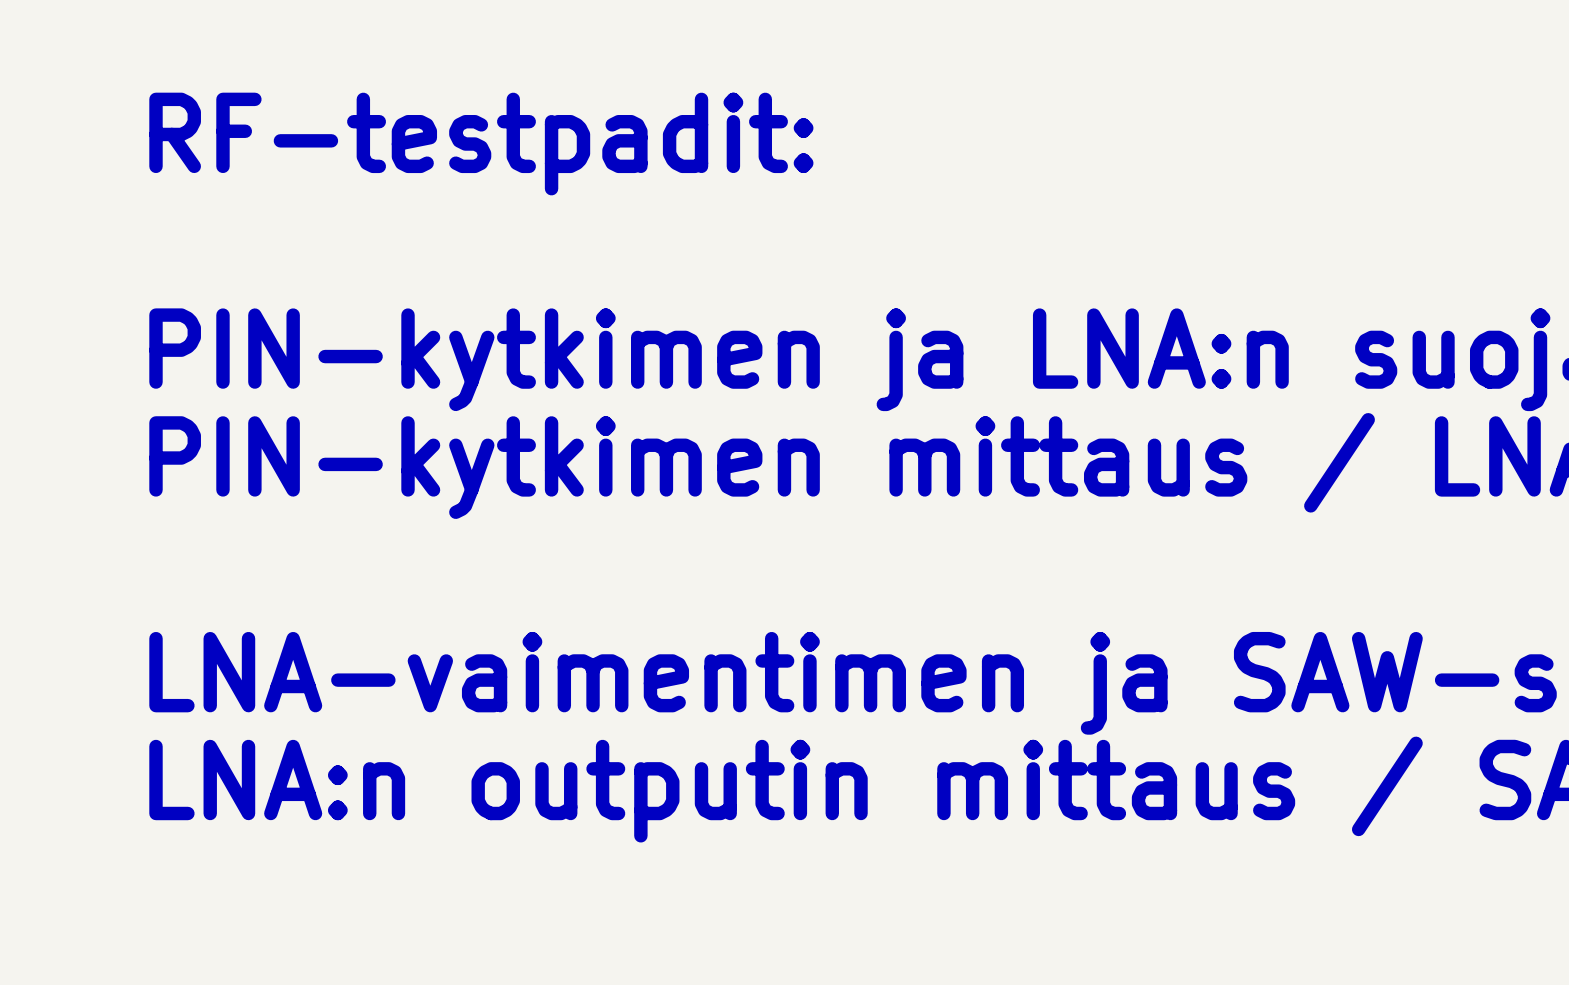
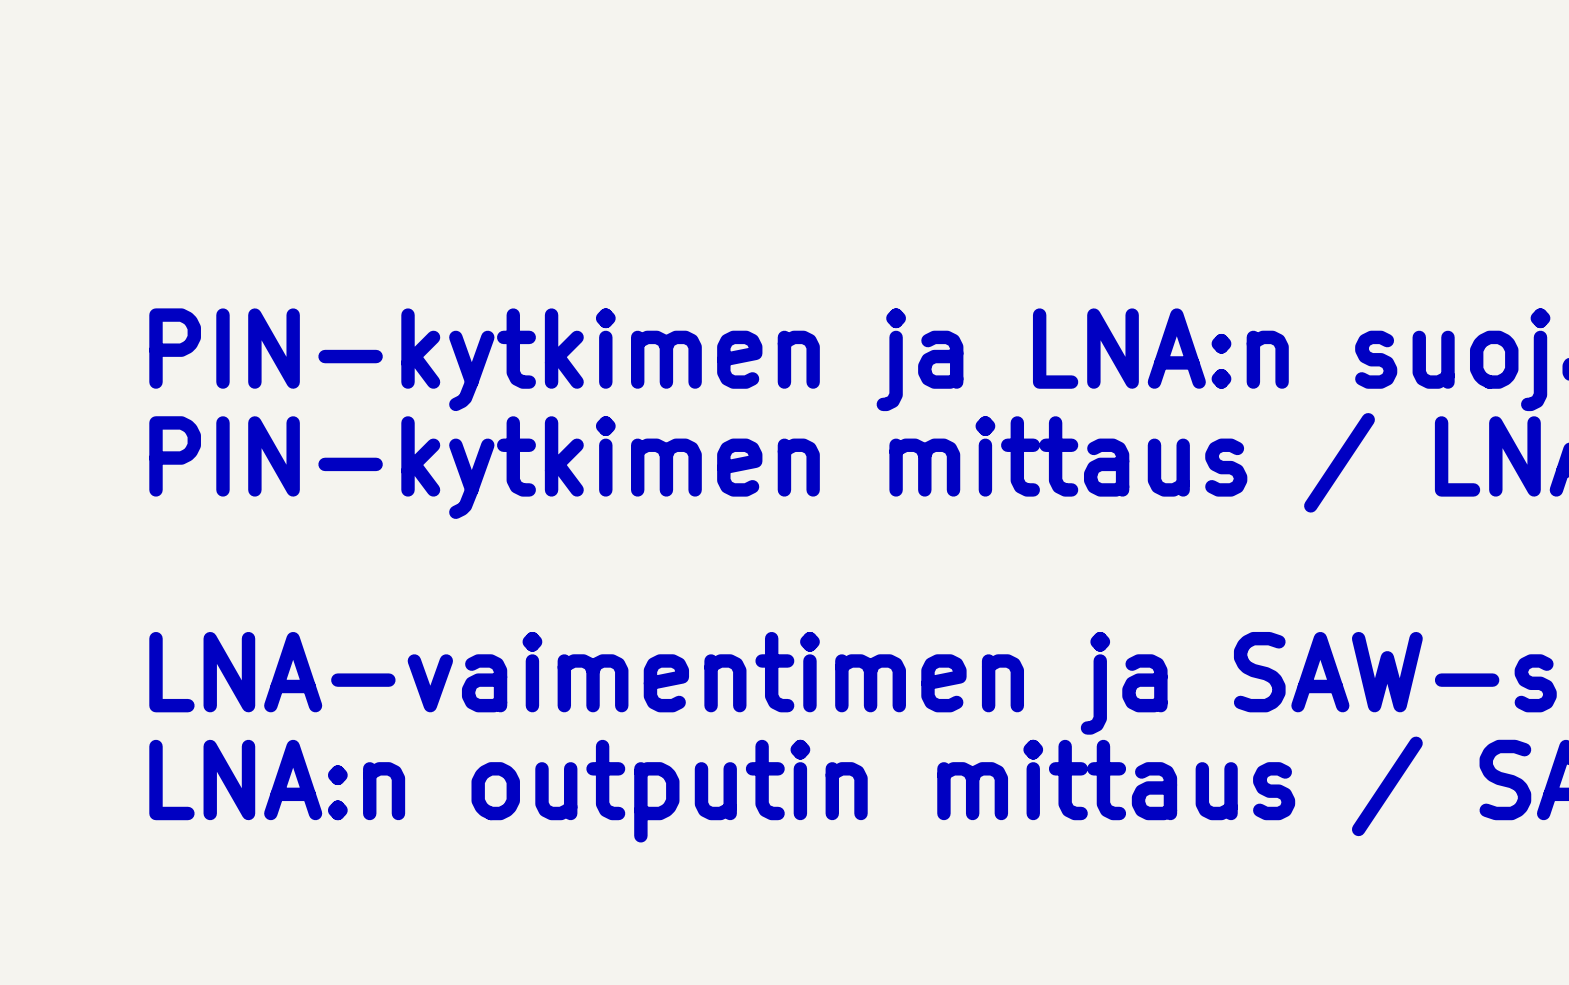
text: RF-testpadit: (481, 144) -> none

